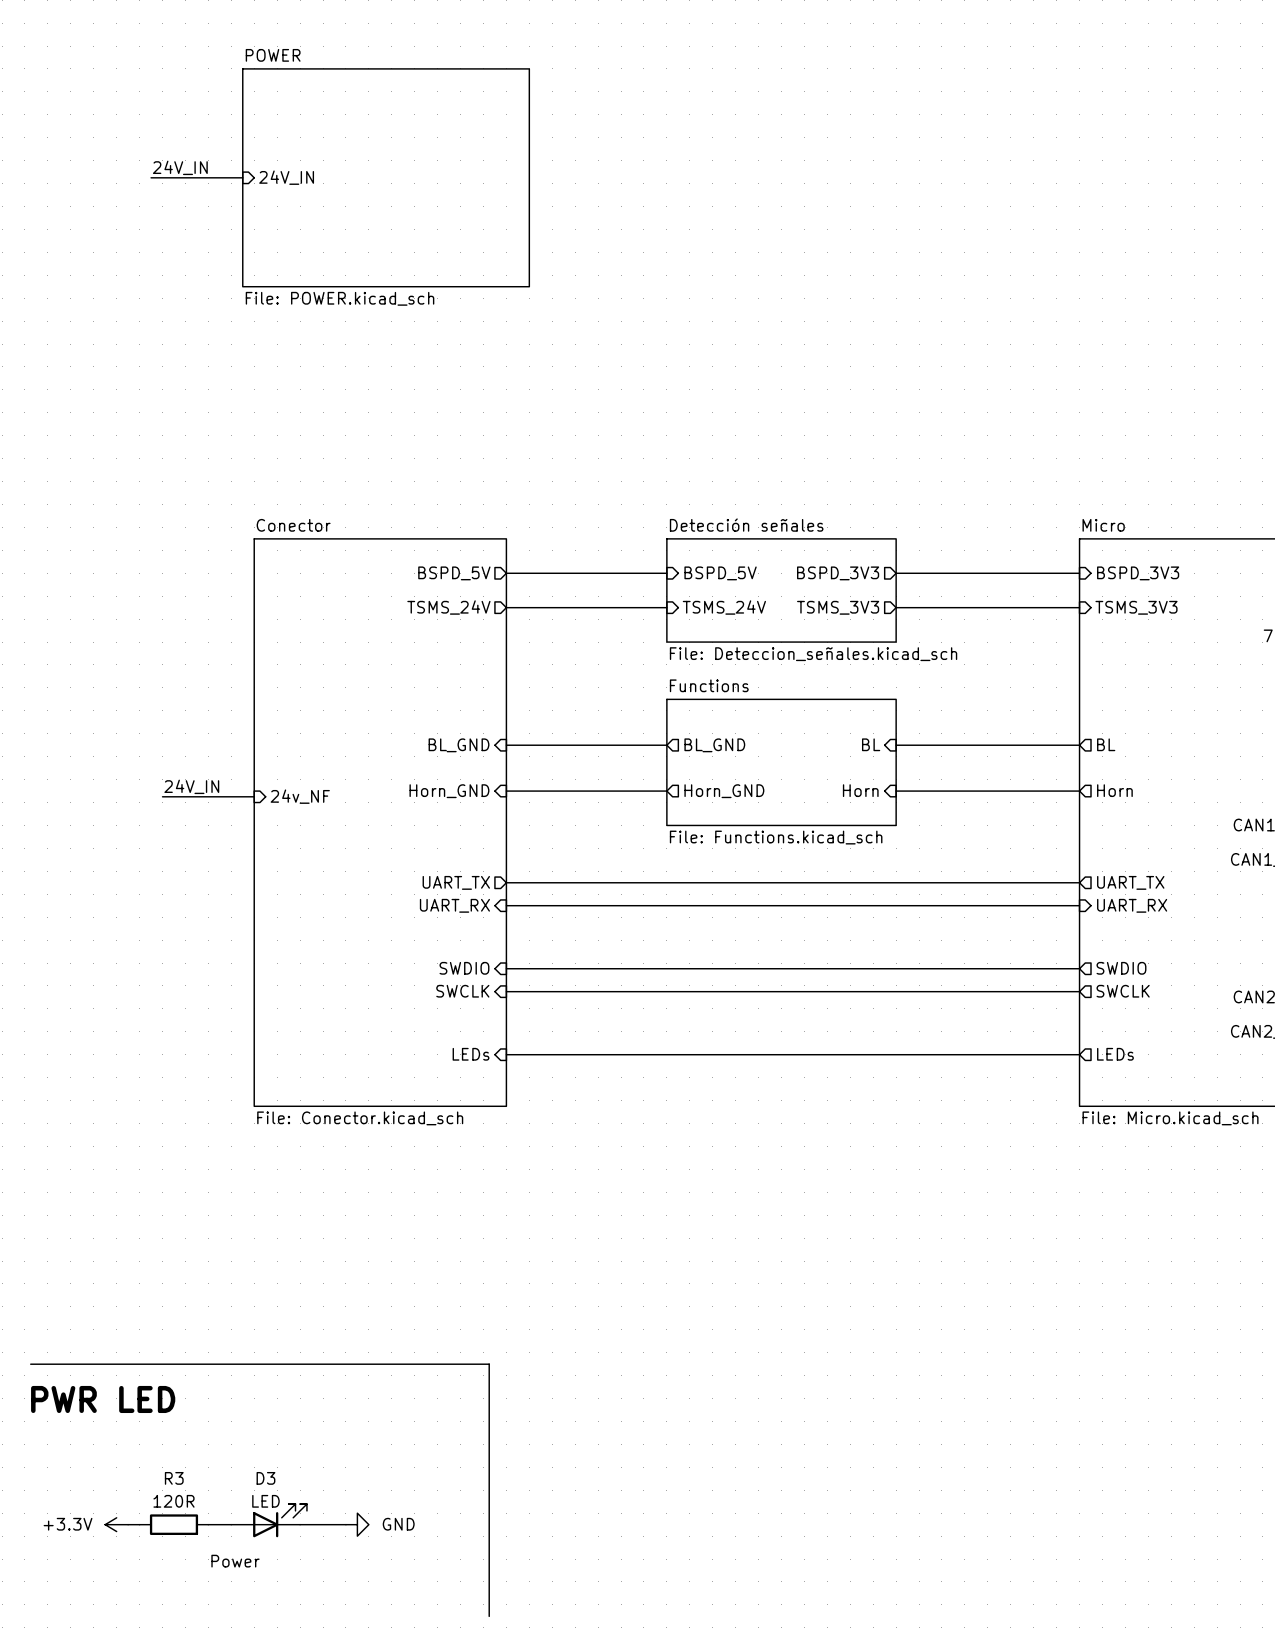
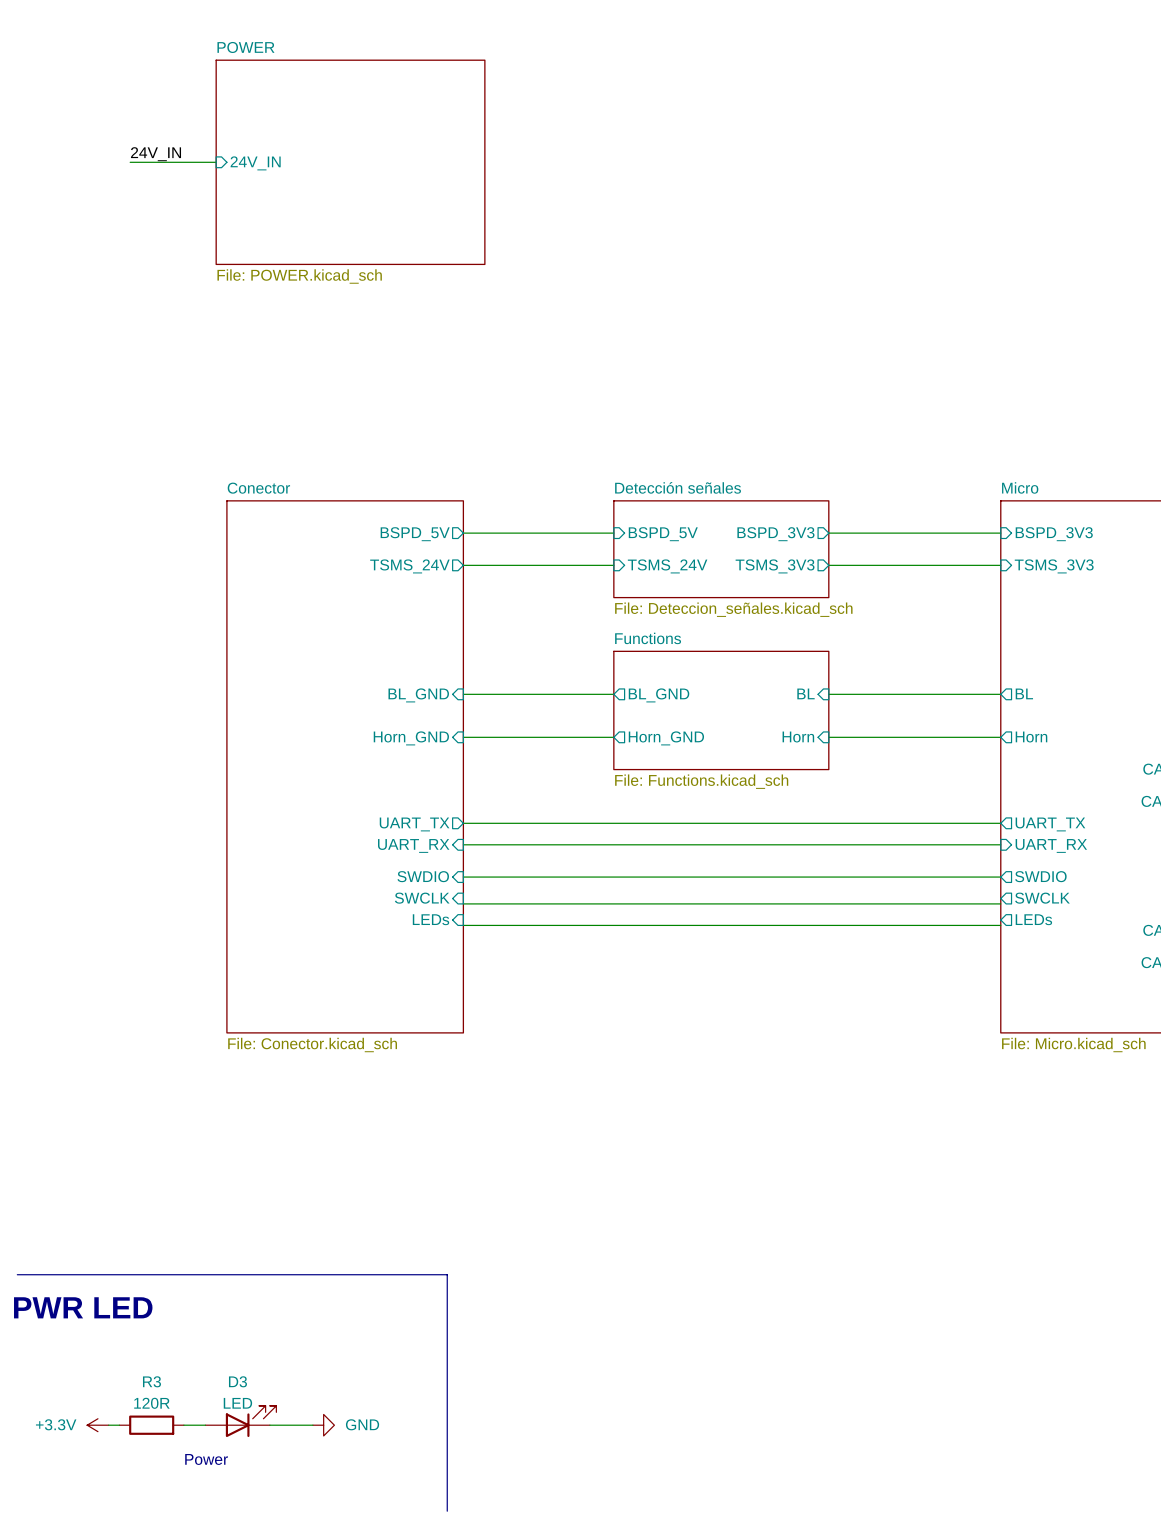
label: 24V_IN (191, 786) -> none
wire: (162, 796) (254, 796) -> none
sheet pin: 24v_NF (300, 796) -> none
sheet pin: none -> SWDIO (423, 876)
sheet pin: none -> SWDIO (1040, 876)
sheet pin: SWDIO (464, 968) -> SWCLK (422, 898)
sheet pin: SWDIO (1121, 968) -> SWCLK (1042, 898)
sheet pin: SWCLK (462, 991) -> LEDs (430, 919)
sheet pin: SWCLK (1123, 991) -> LEDs (1033, 919)
sheet pin: LEDs (471, 1054) -> none
wire: (506, 1054) (1079, 1054) -> (463, 877) (1000, 877)
sheet pin: LEDs (1115, 1054) -> none

